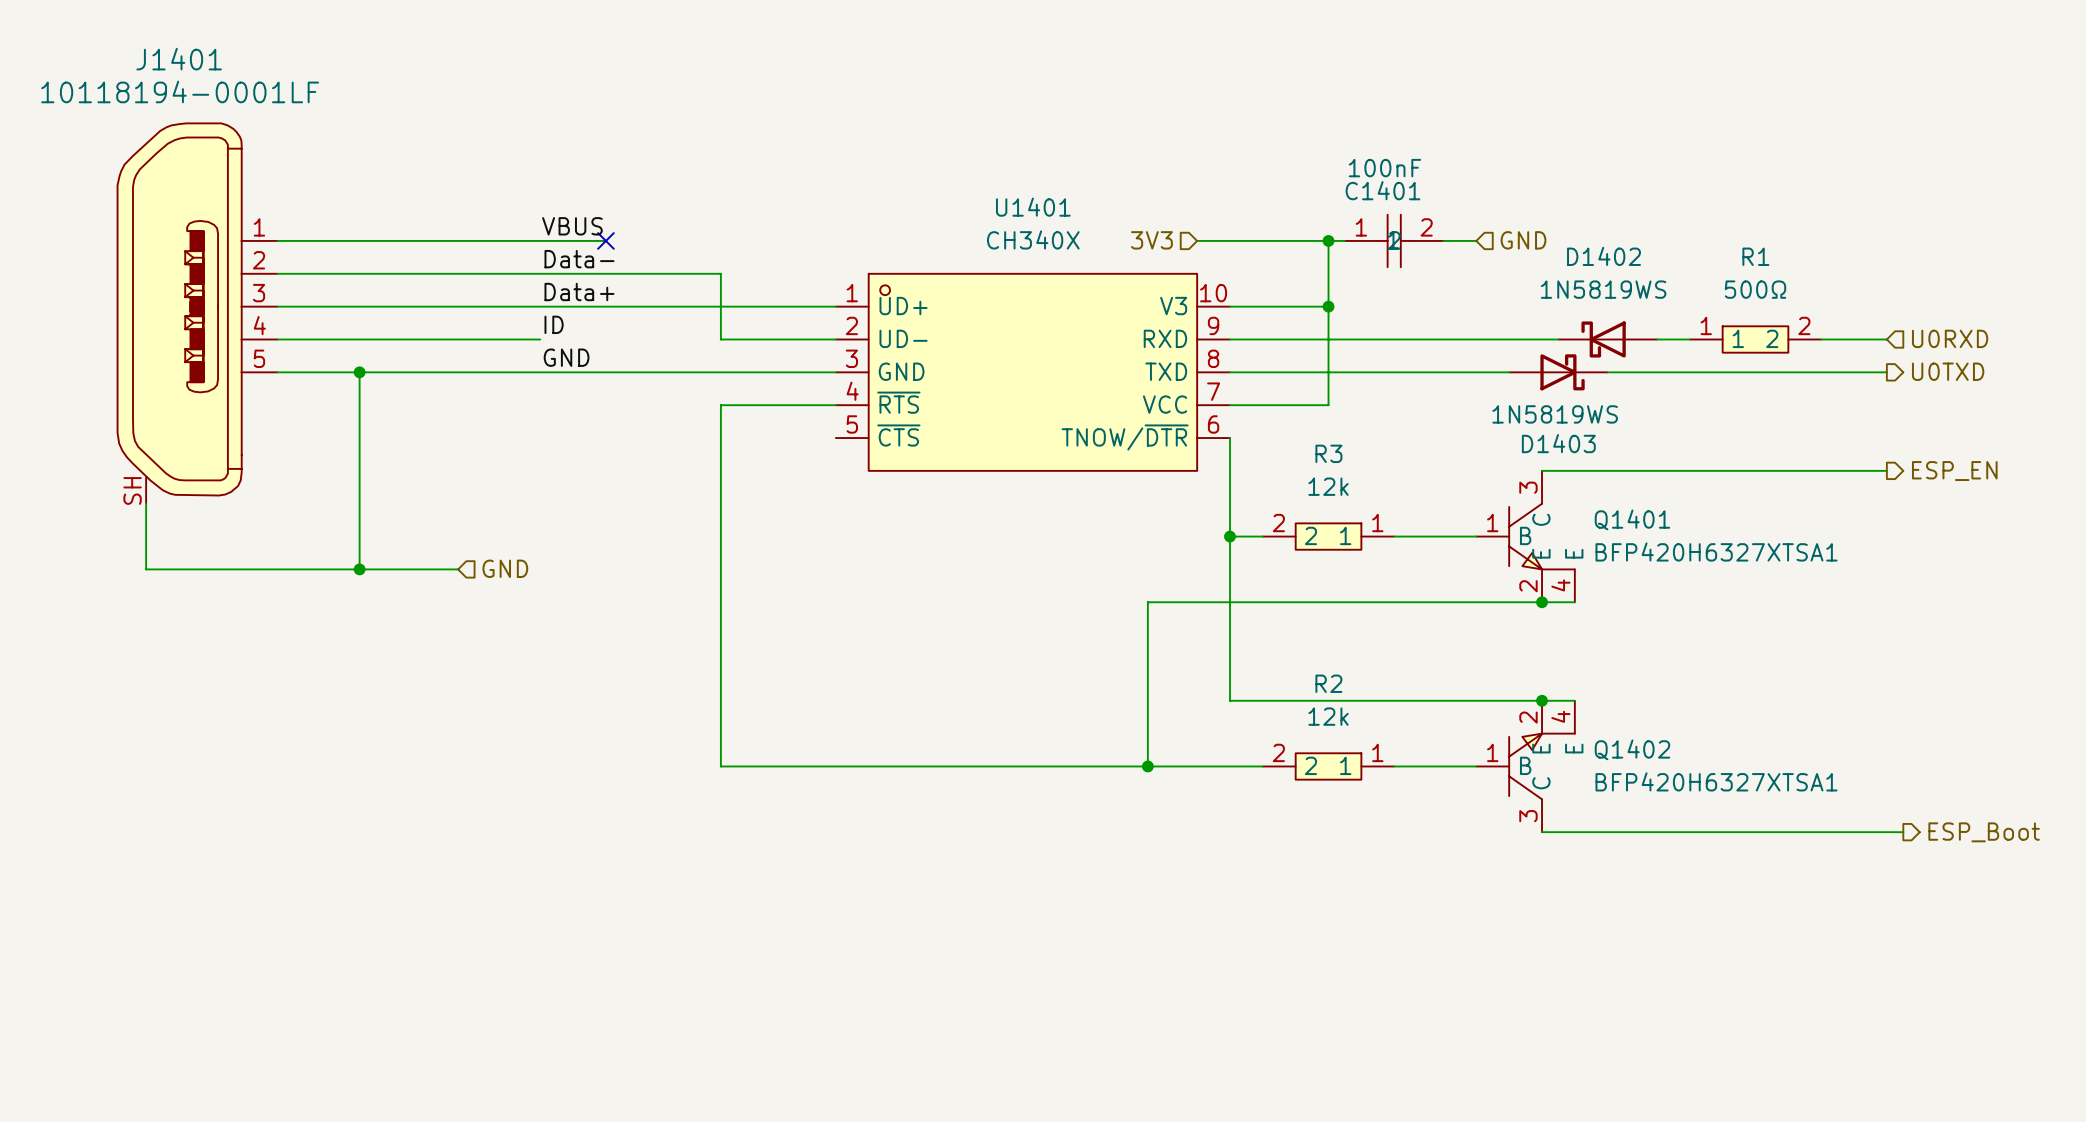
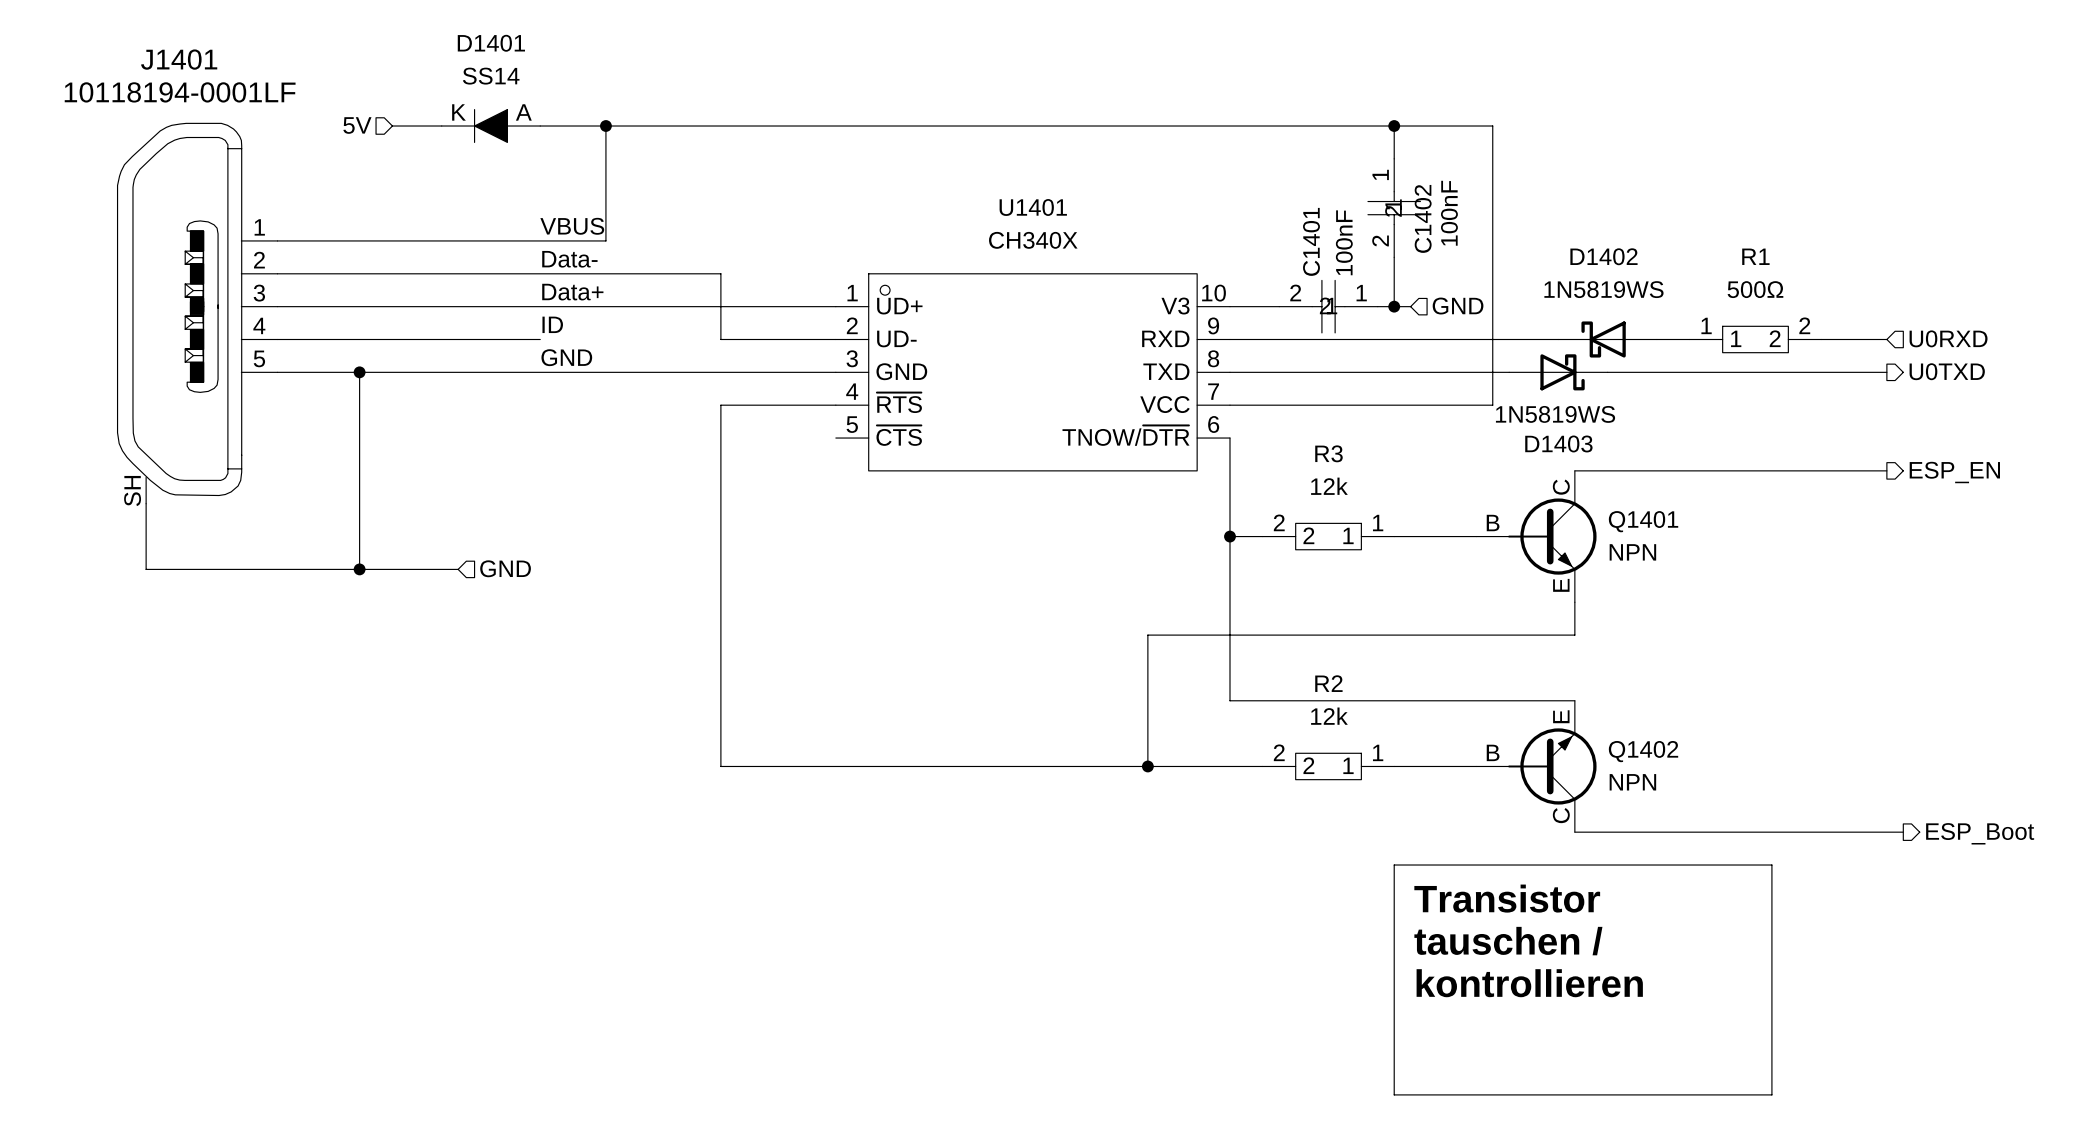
hierarchical label: none -> 5V (357, 125)
wire: none -> (392, 126) (441, 126)
D1401: none -> SS14 (490, 126)
wire: none -> (605, 126) (605, 240)
junction: none -> (605, 126)
wire: none -> (1394, 126) (1394, 158)
junction: none -> (1394, 126)
C1401 value position: 100nF (1384, 168) -> 100nF (1344, 242)
C1402: none -> 100nF (1394, 208)
no-connect mark: (605, 240) -> none
hierarchical label: 3V3 (1151, 240) -> none
wire: (1197, 240) (1344, 240) -> none
wire: (1328, 240) (1328, 405) -> (540, 126) (1492, 126) (1492, 405) (1328, 405)
junction: (1328, 240) -> none
C1401 rotation: 0° (1394, 240) -> 180° (1328, 306)
C1401 position: (1394, 240) -> (1328, 306)
wire: (1443, 240) (1476, 240) -> (1377, 306) (1410, 306)
hierarchical label position: GND (1523, 240) -> GND (1458, 306)
wire: none -> (1394, 257) (1394, 306)
junction: (1328, 306) -> none
junction: none -> (1394, 306)
Q1401 symbol: [1476, 470, 1575, 603] -> [1476, 470, 1597, 603]
wire: (1542, 470) (1574, 470) -> none
Q1401 value: BFP420H6327XTSA1 (1716, 551) -> NPN (1632, 552)
junction: (1542, 602) -> none
wire: (1574, 602) (1147, 602) (1147, 635) -> (1574, 602) (1574, 635) (1147, 635)
Q1402 symbol: [1476, 700, 1575, 833] -> [1476, 700, 1597, 833]
junction: (1542, 700) -> none
Q1402 value: BFP420H6327XTSA1 (1716, 781) -> NPN (1632, 782)
wire: (1542, 832) (1574, 832) -> none
line: none -> (1394, 865) (1771, 865) (1771, 1094) (1394, 1094) (1394, 865)
text: none -> Transistor (1507, 898)
text: none -> tauschen / (1508, 941)
text: none -> kontrollieren (1529, 983)

